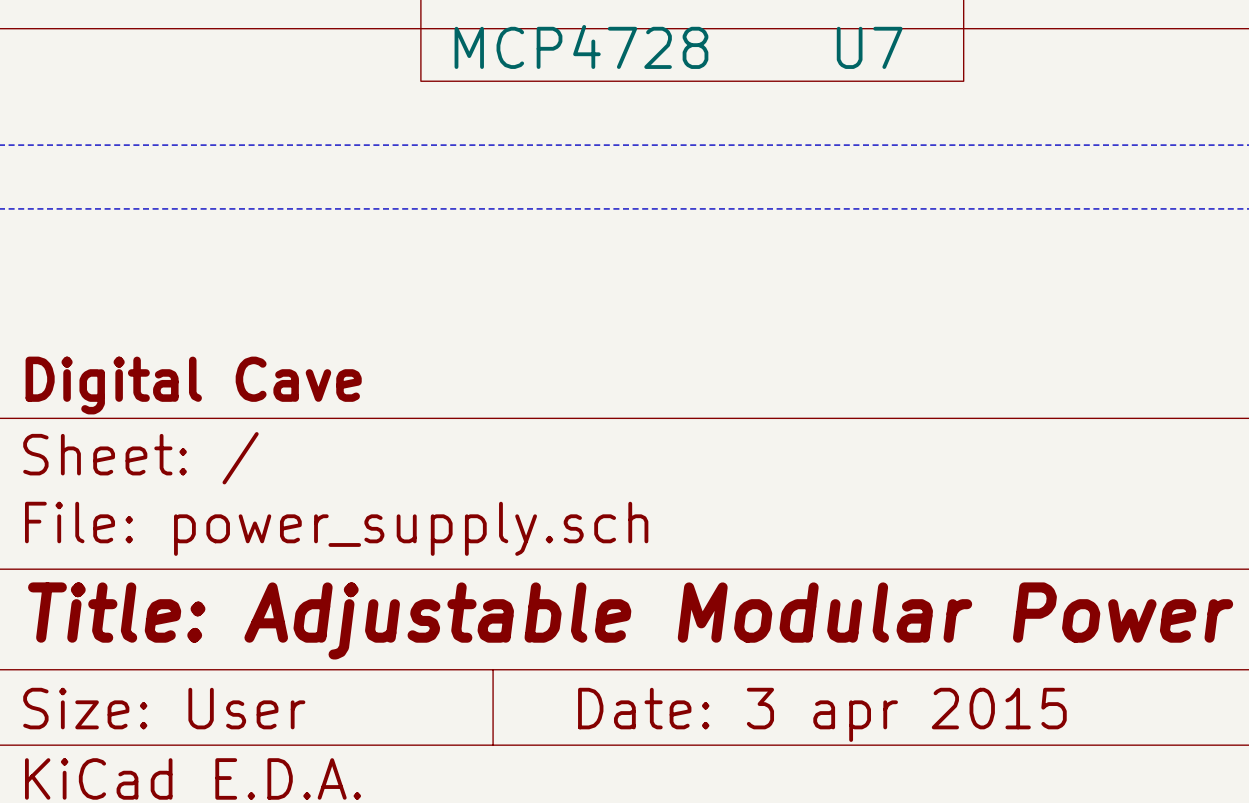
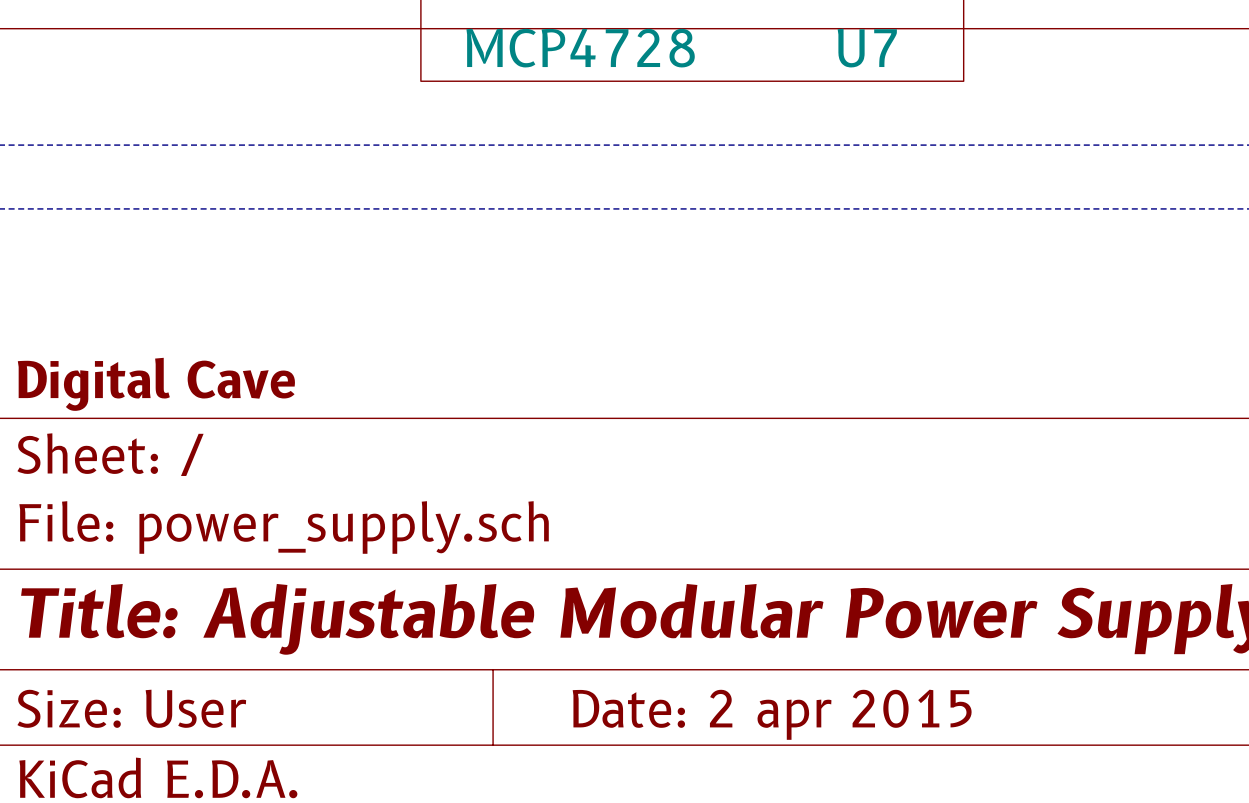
title block: Date: 3 apr 2015 (822, 714) -> Date: 2 apr 2015 (772, 714)

